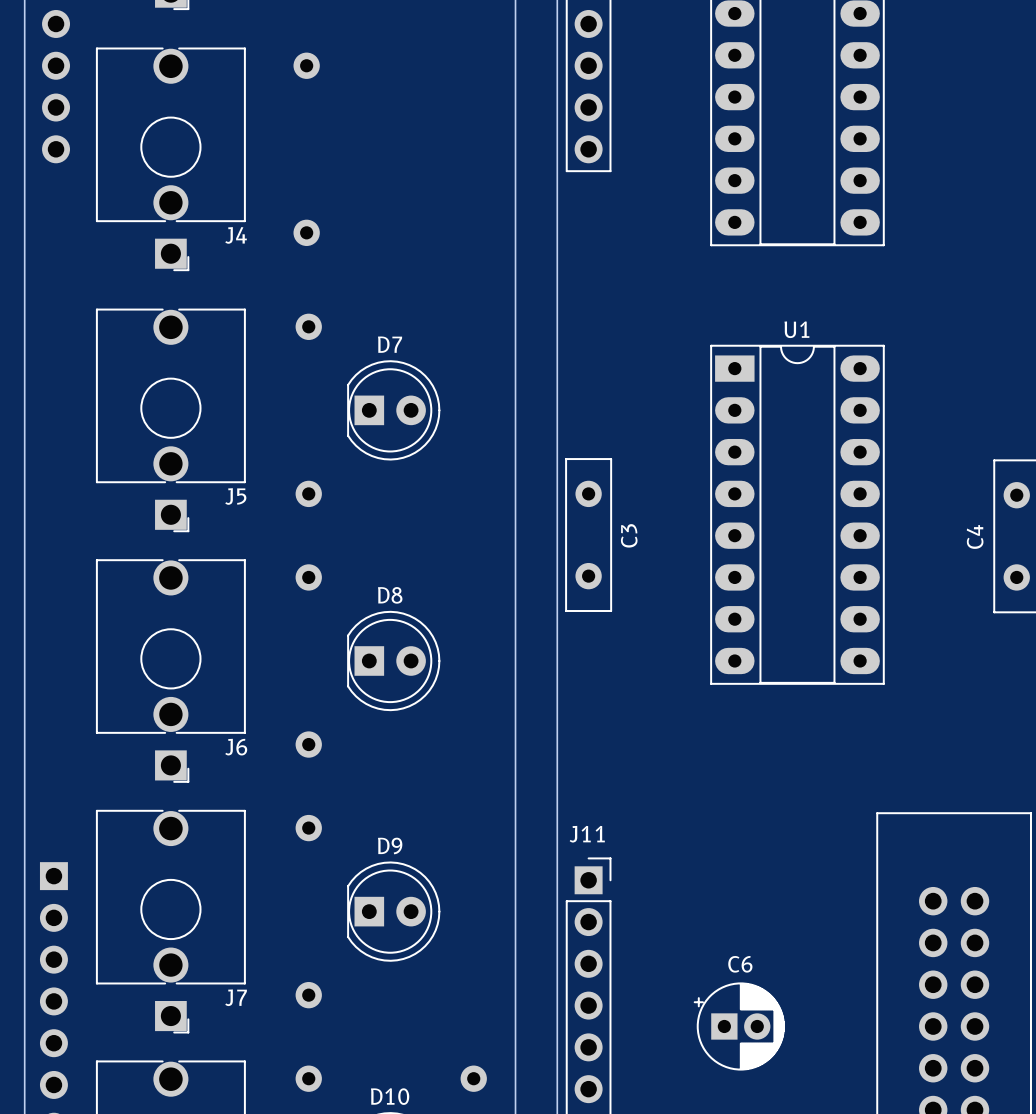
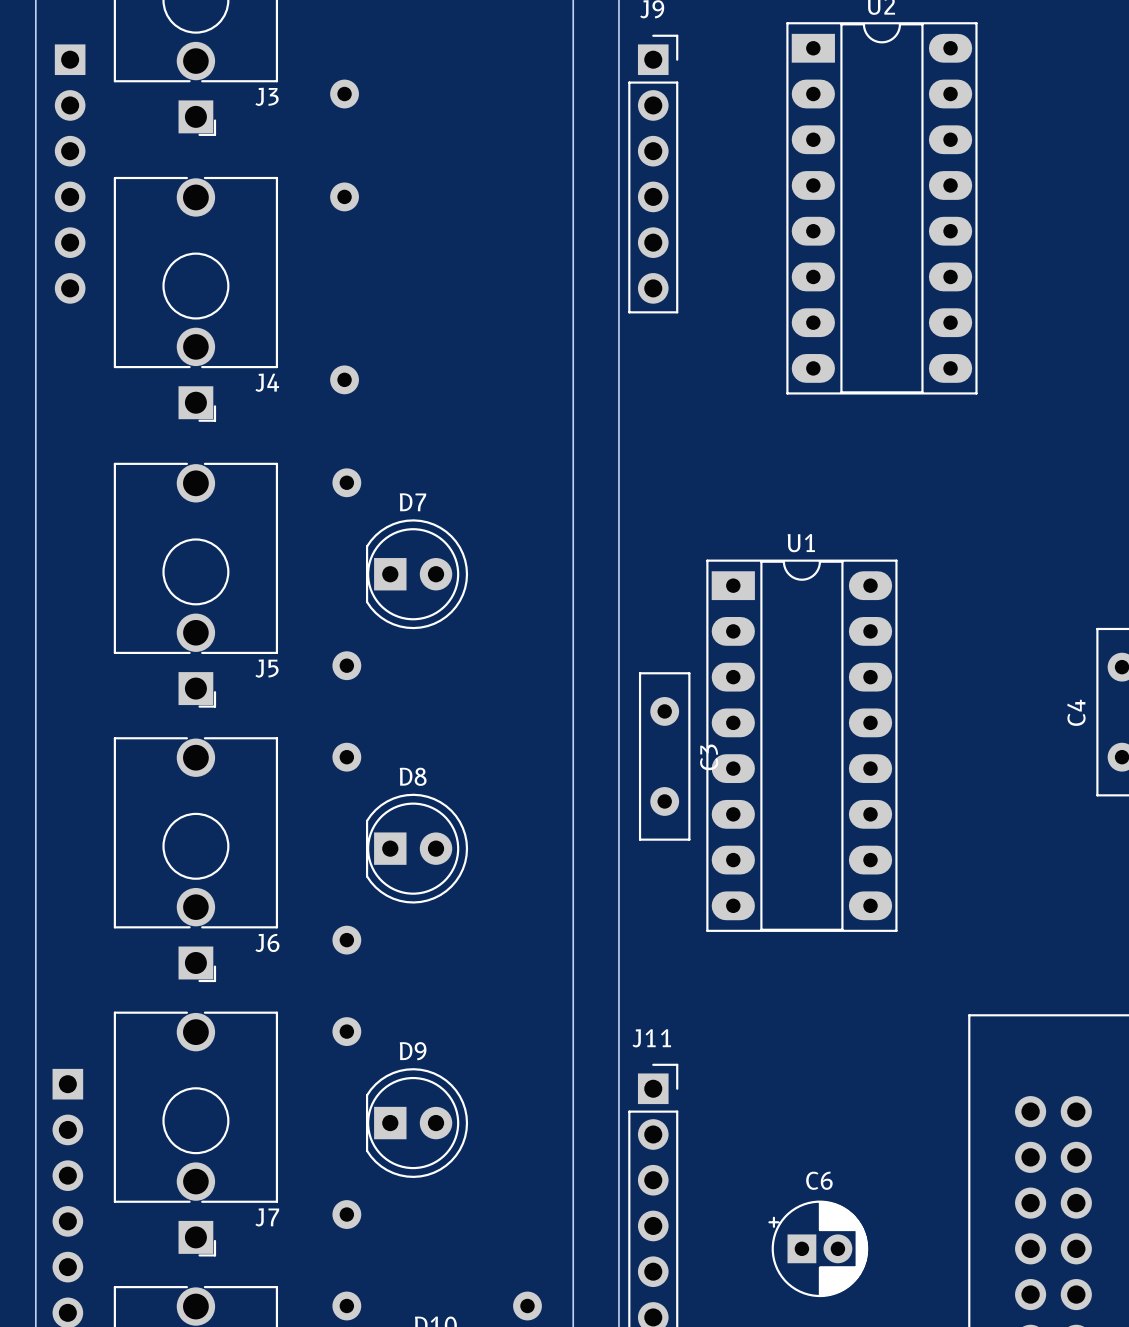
D7 position: (393, 410) -> (417, 574)
U1 position: (797, 514) -> (801, 745)
C3 position: (588, 535) -> (664, 756)
D8 position: (393, 660) -> (417, 848)
D9 position: (393, 911) -> (417, 1123)

